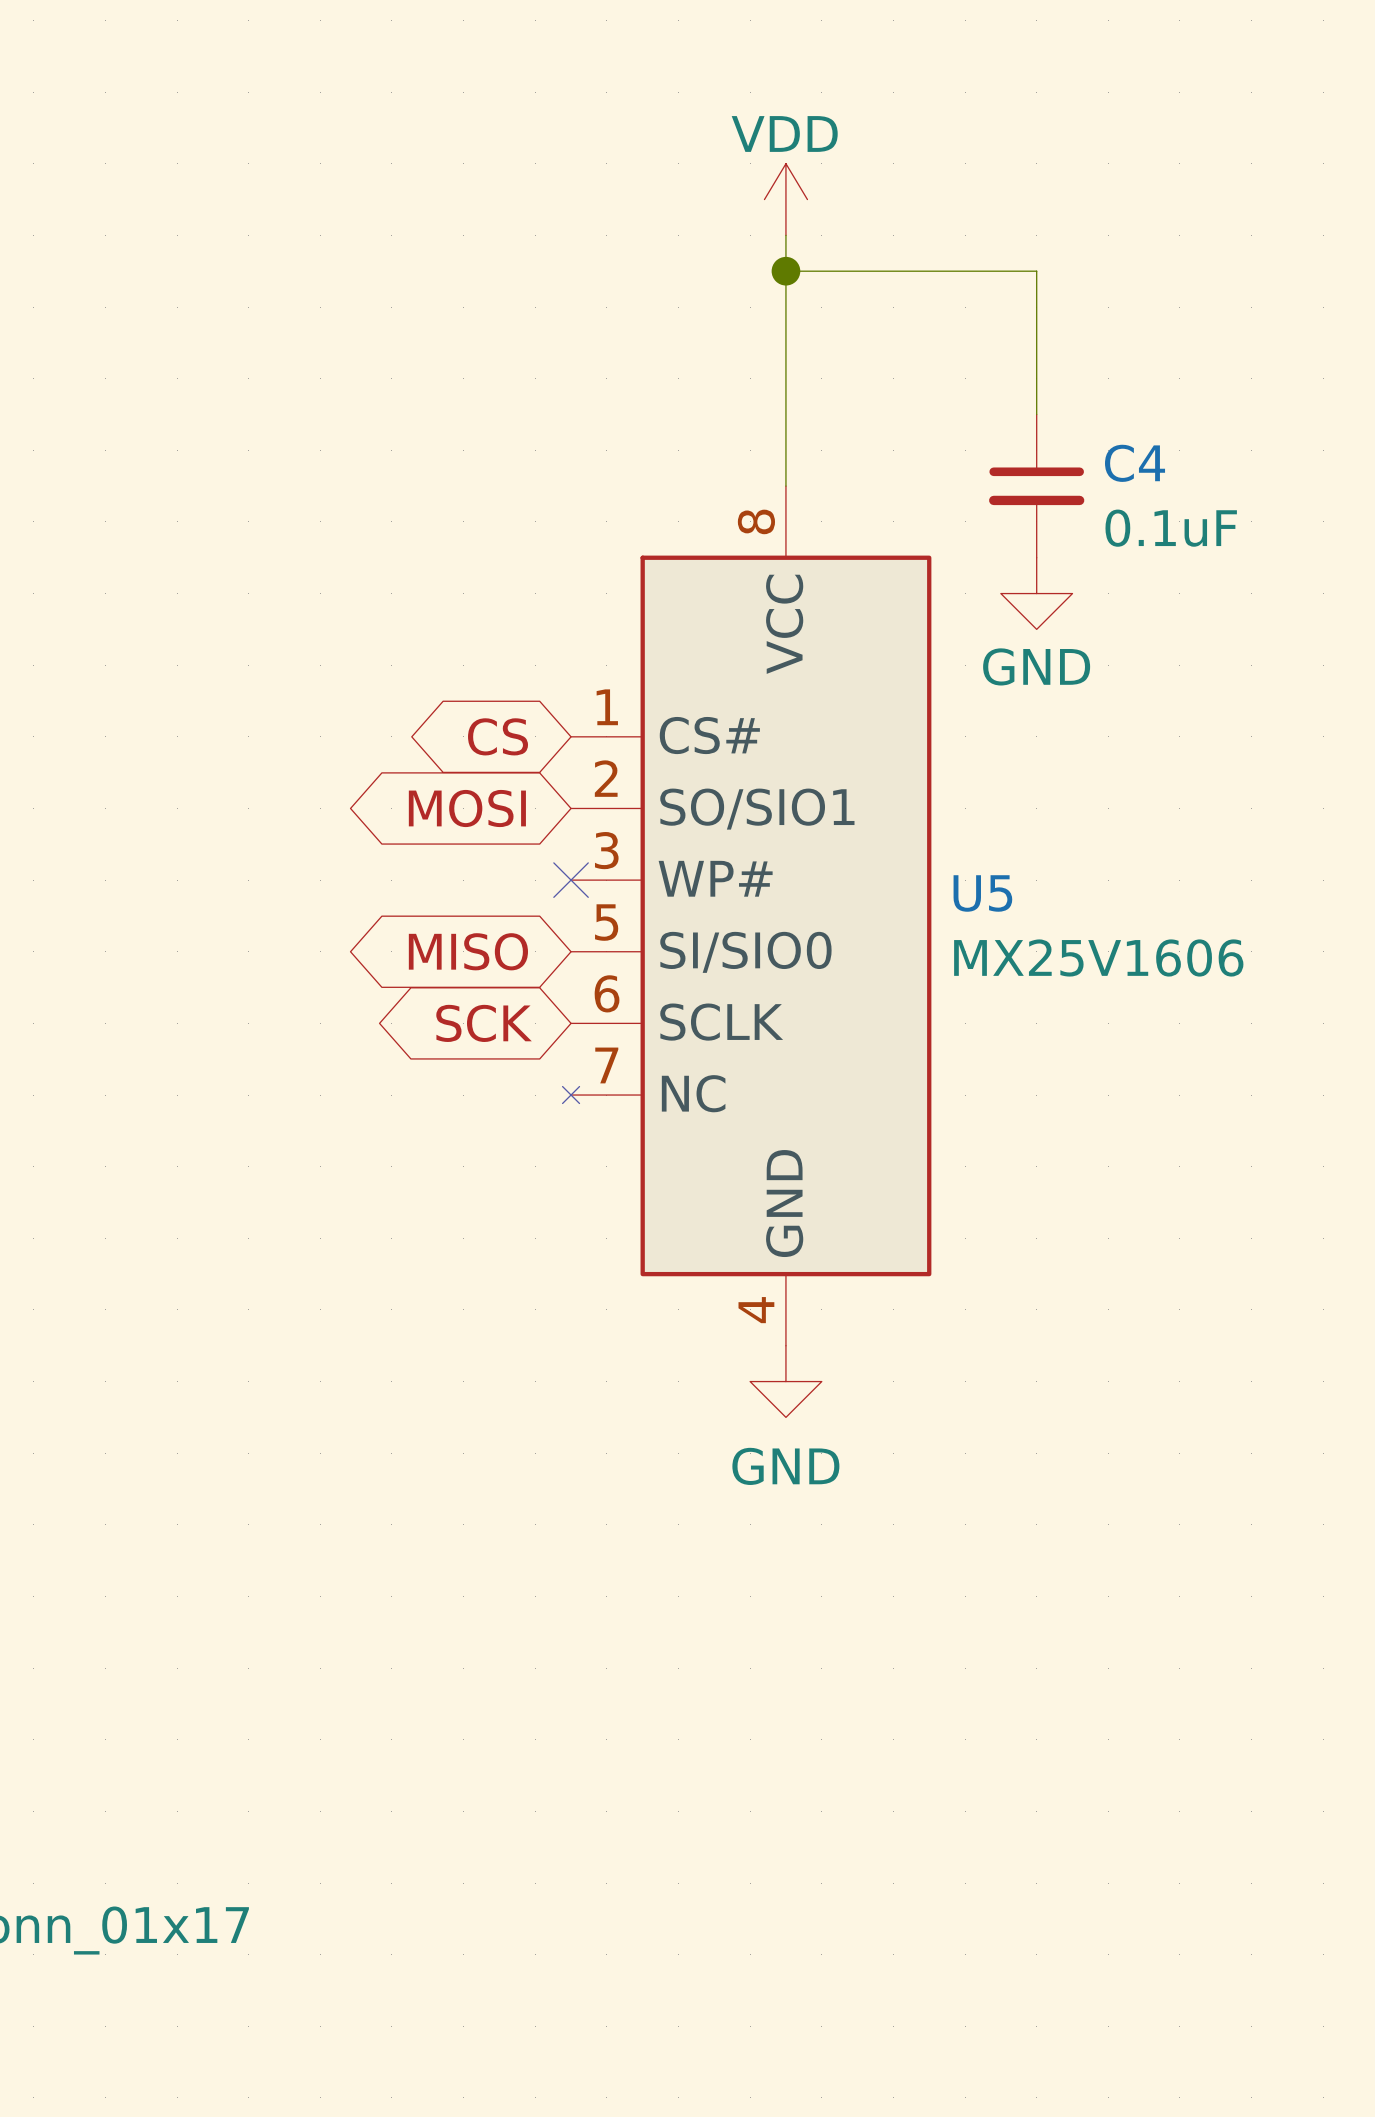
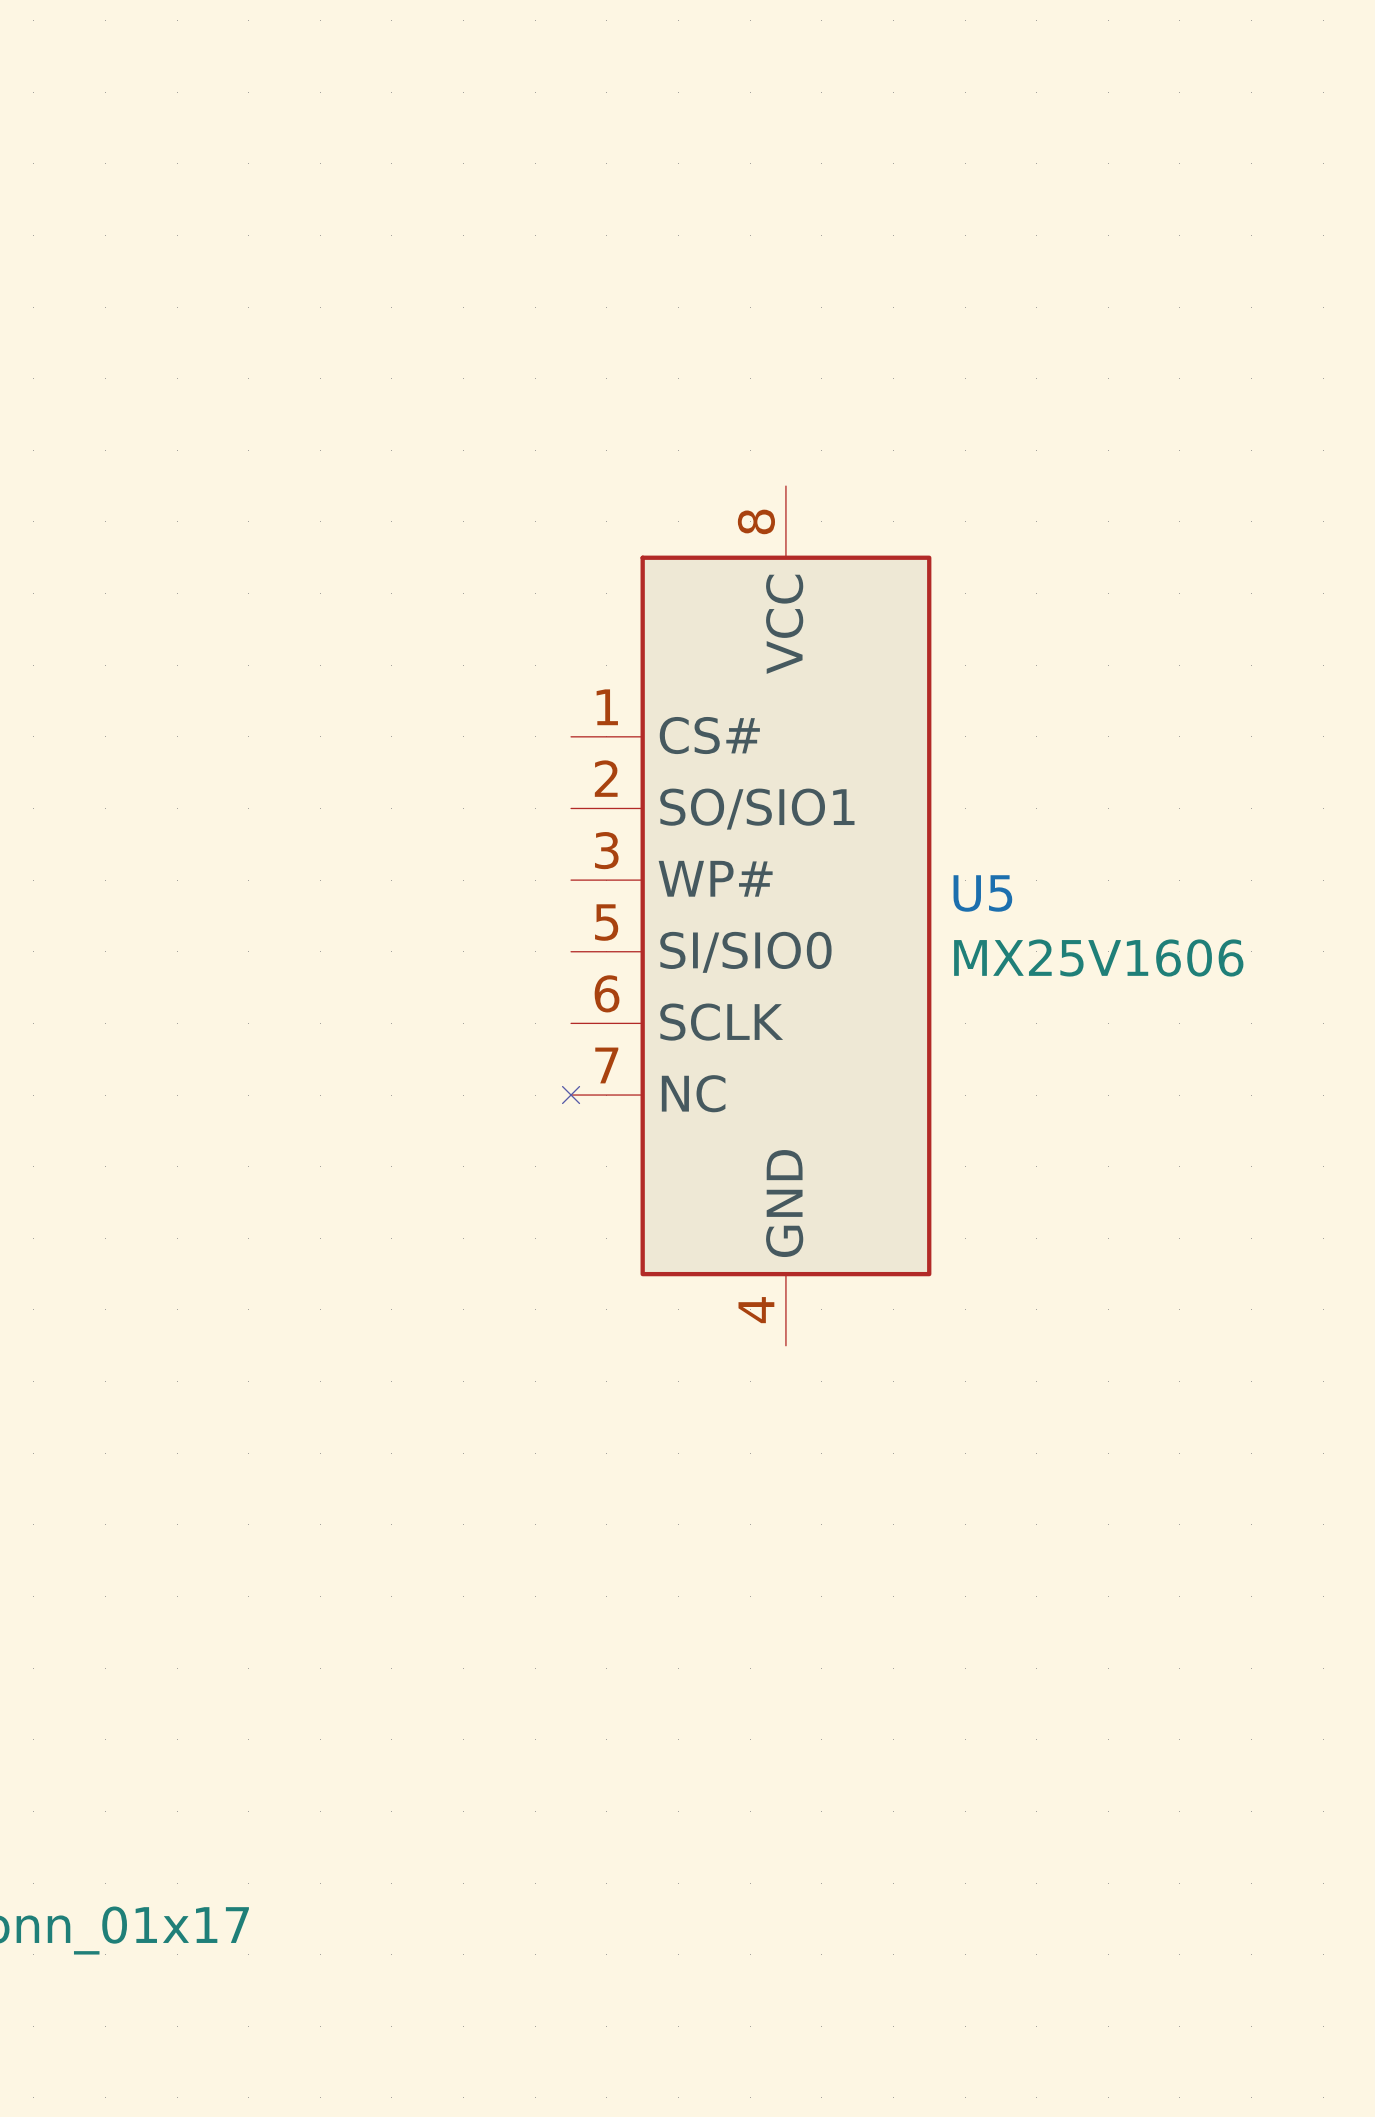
power symbol: VDD (785, 199) -> none
wire: (785, 235) (785, 486) -> none
wire: (785, 271) (1036, 271) (1036, 414) -> none
junction: (785, 271) -> none
C4: 0.1uF (1036, 486) -> none
power symbol: GND (1036, 593) -> none
global label: CS (498, 736) -> none
global label: MOSI (467, 808) -> none
no-connect mark: (571, 880) -> none
global label: MISO (468, 951) -> none
global label: SCK (484, 1023) -> none
power symbol: GND (785, 1381) -> none

